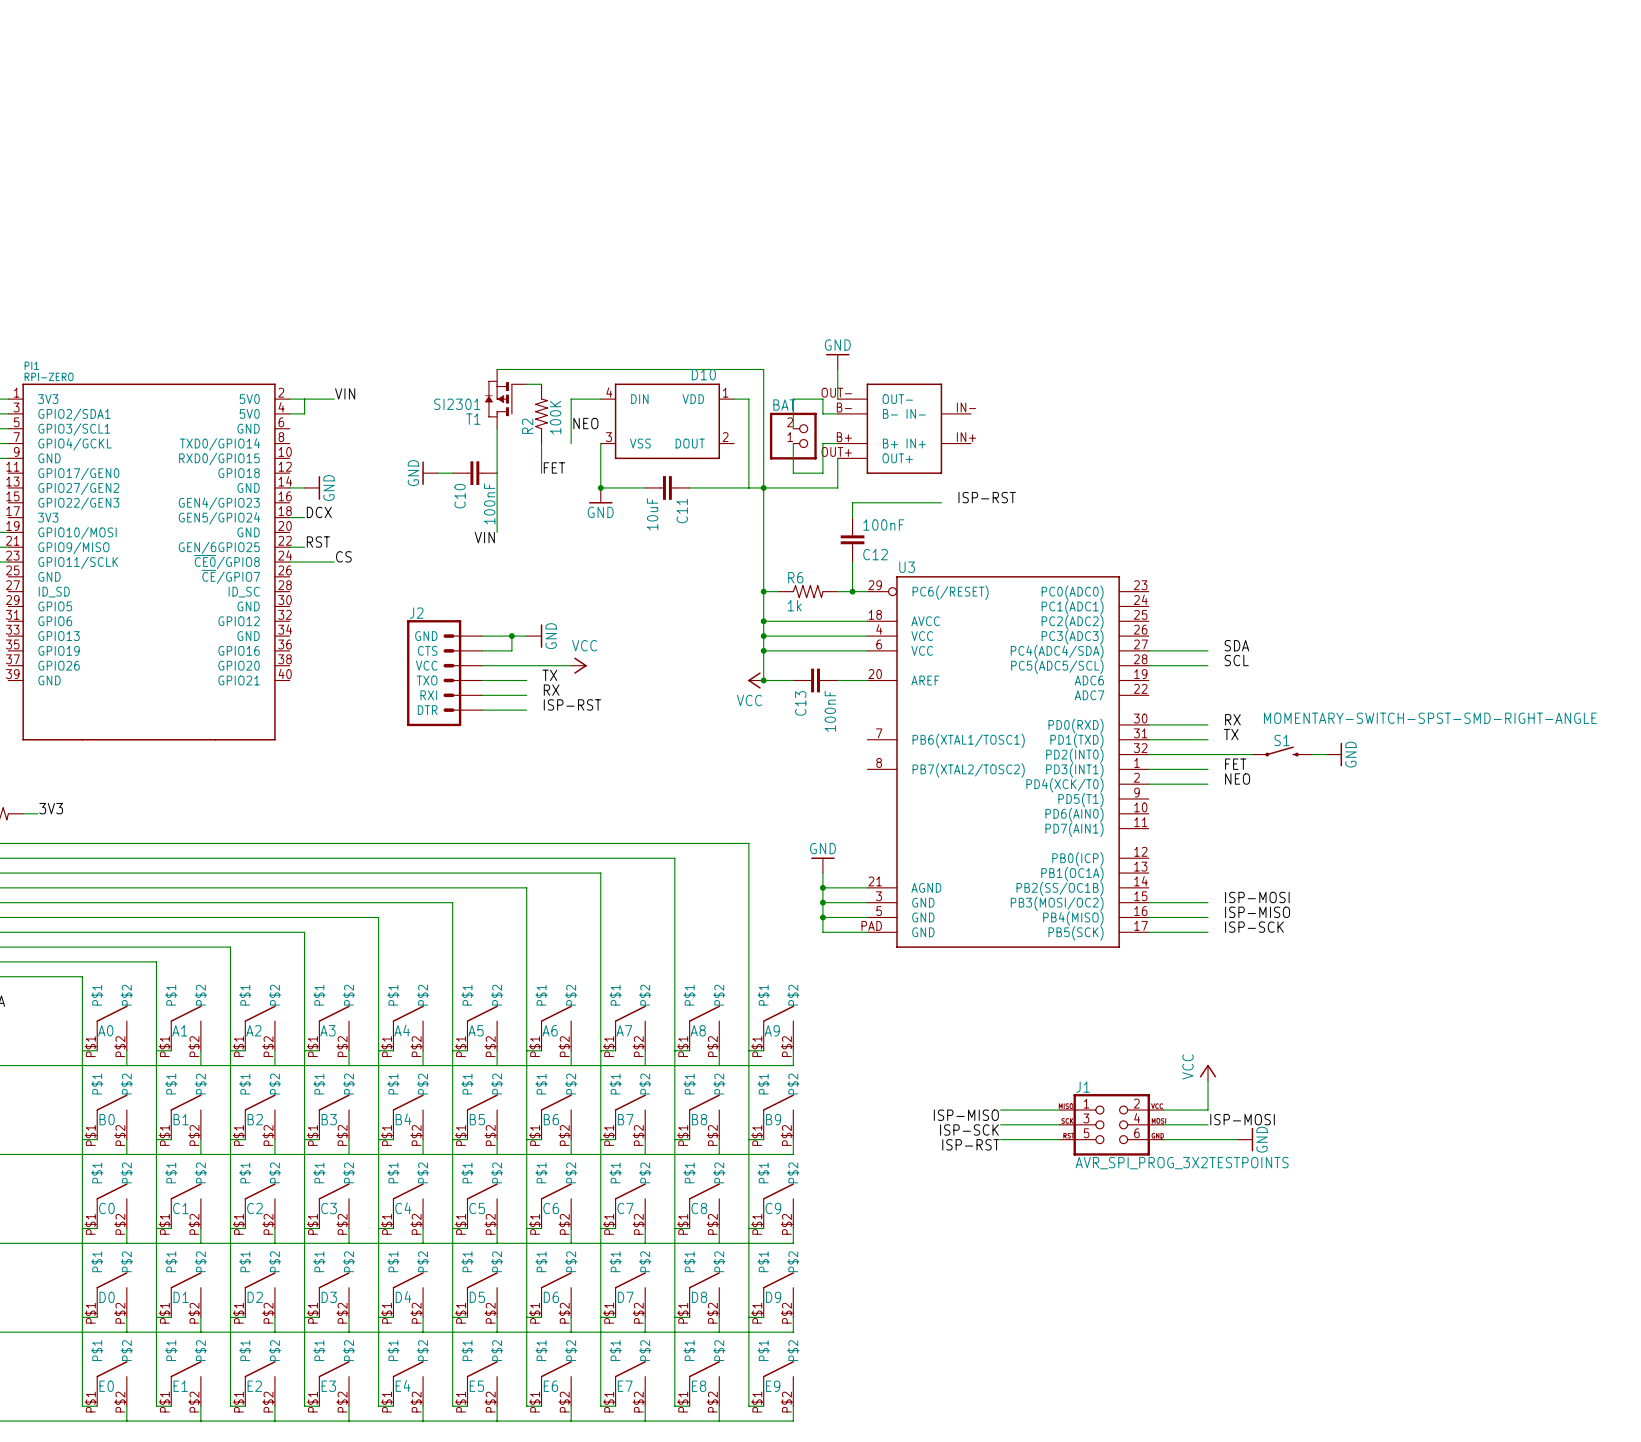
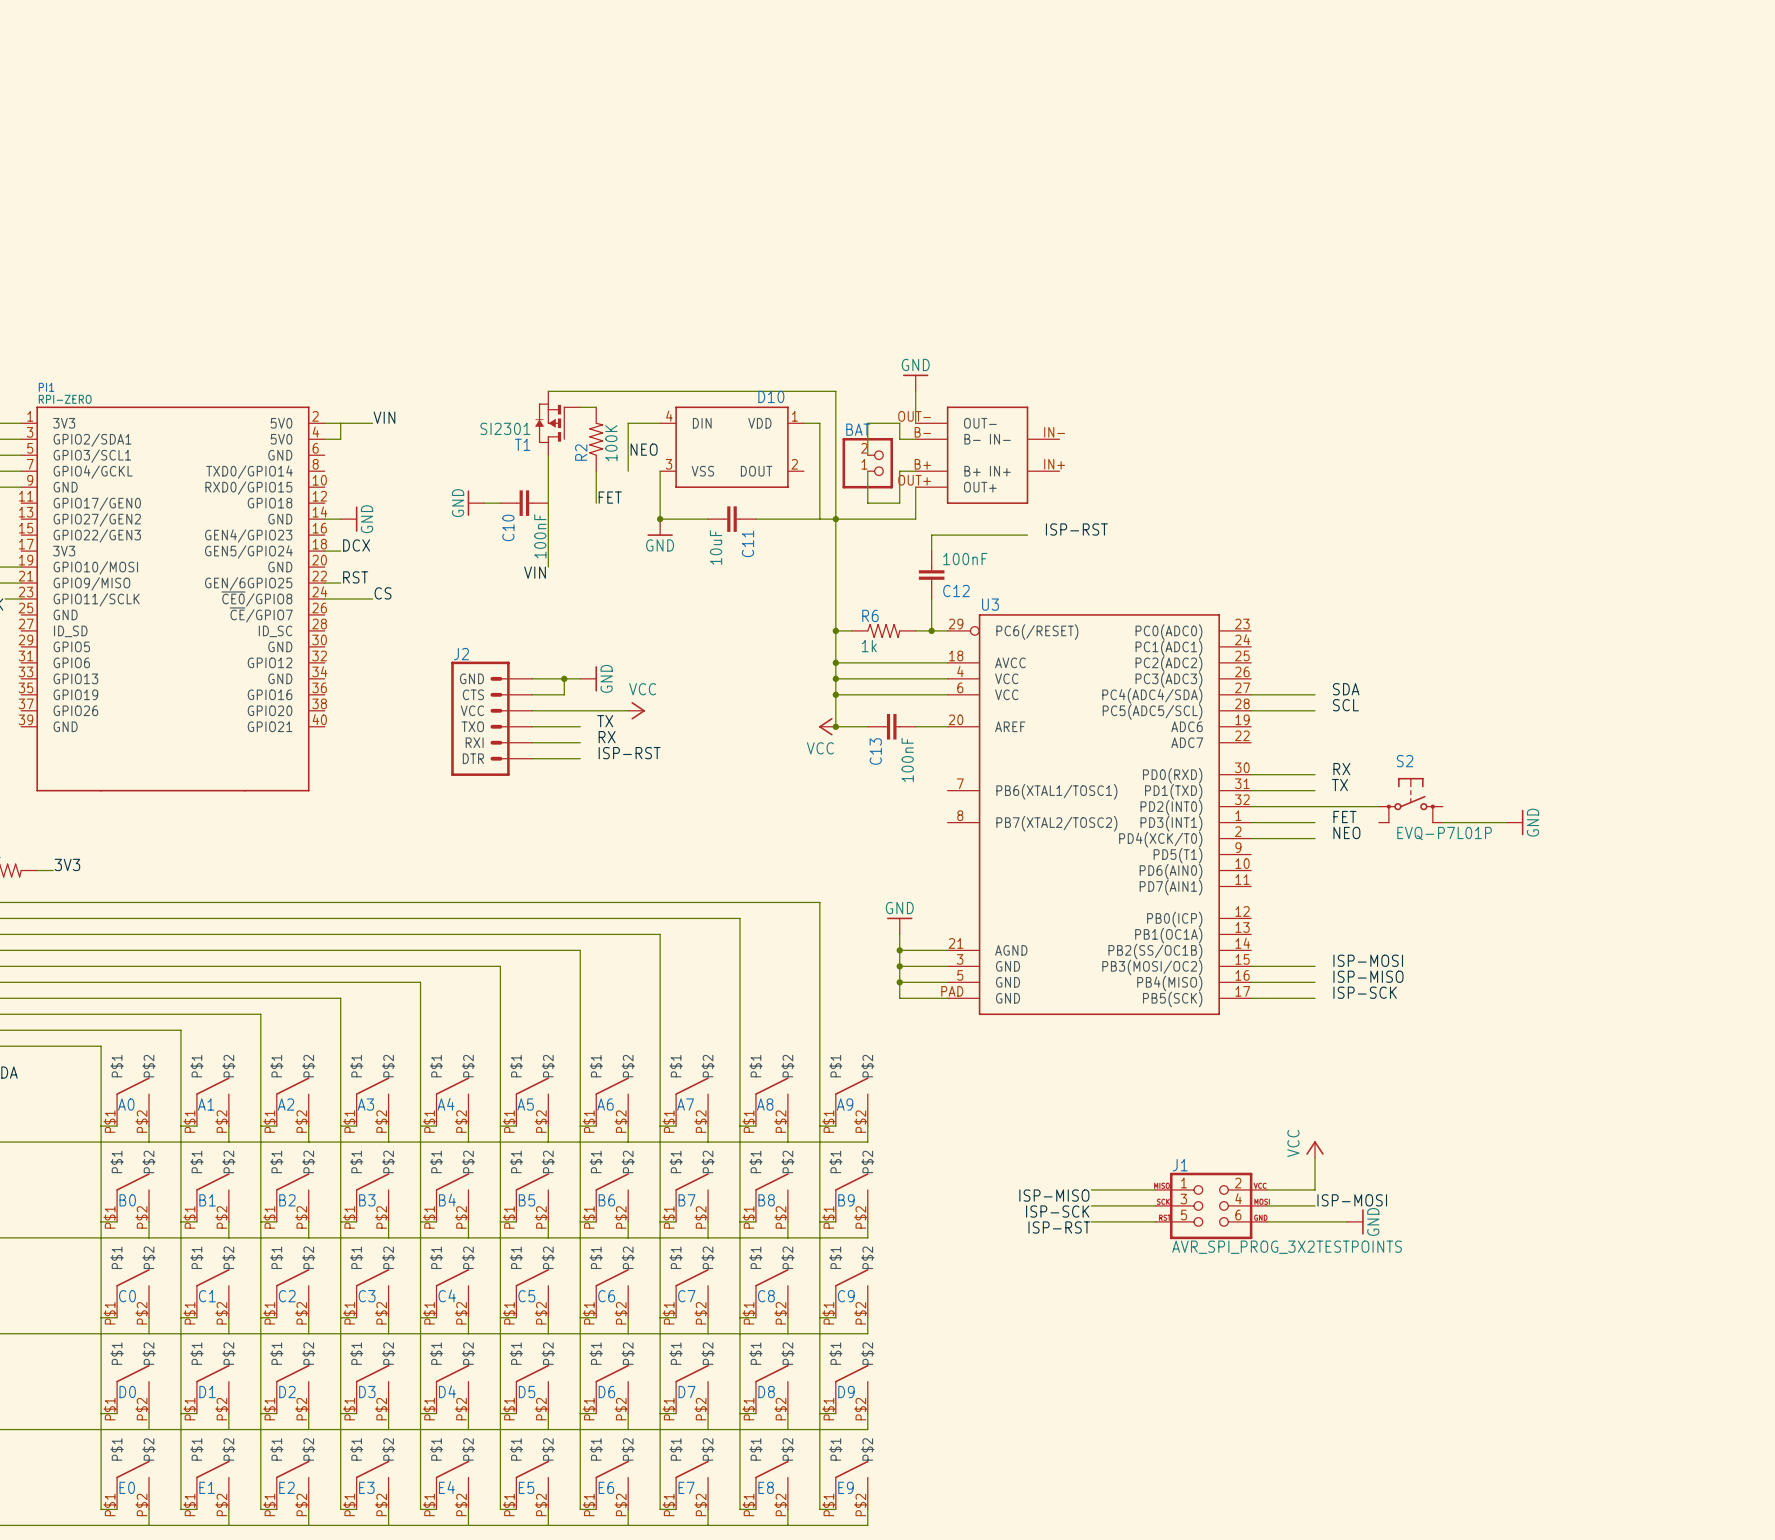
S2: none -> EVQ-P7L01P (1410, 800)
S1: MOMENTARY-SWITCH-SPST-SMD-RIGHT-ANGLE (1282, 751) -> none
power symbol position: GND (1334, 754) -> GND (1515, 822)
wire: none -> (1442, 822) (1506, 822)

